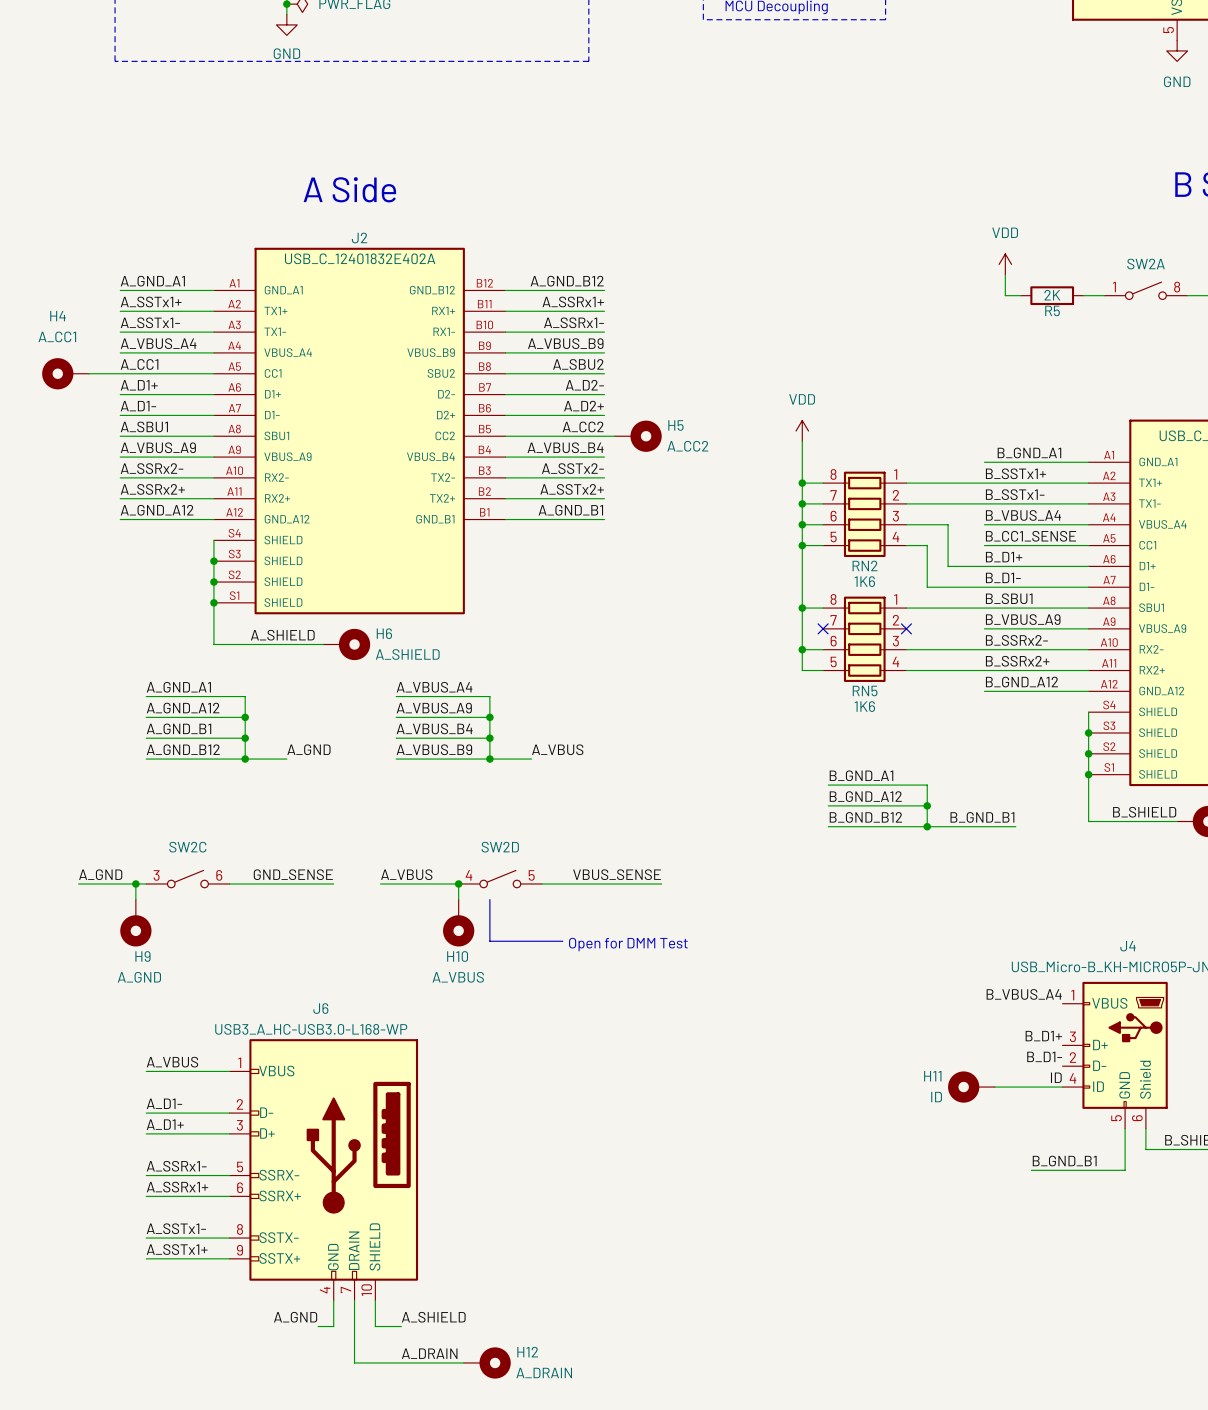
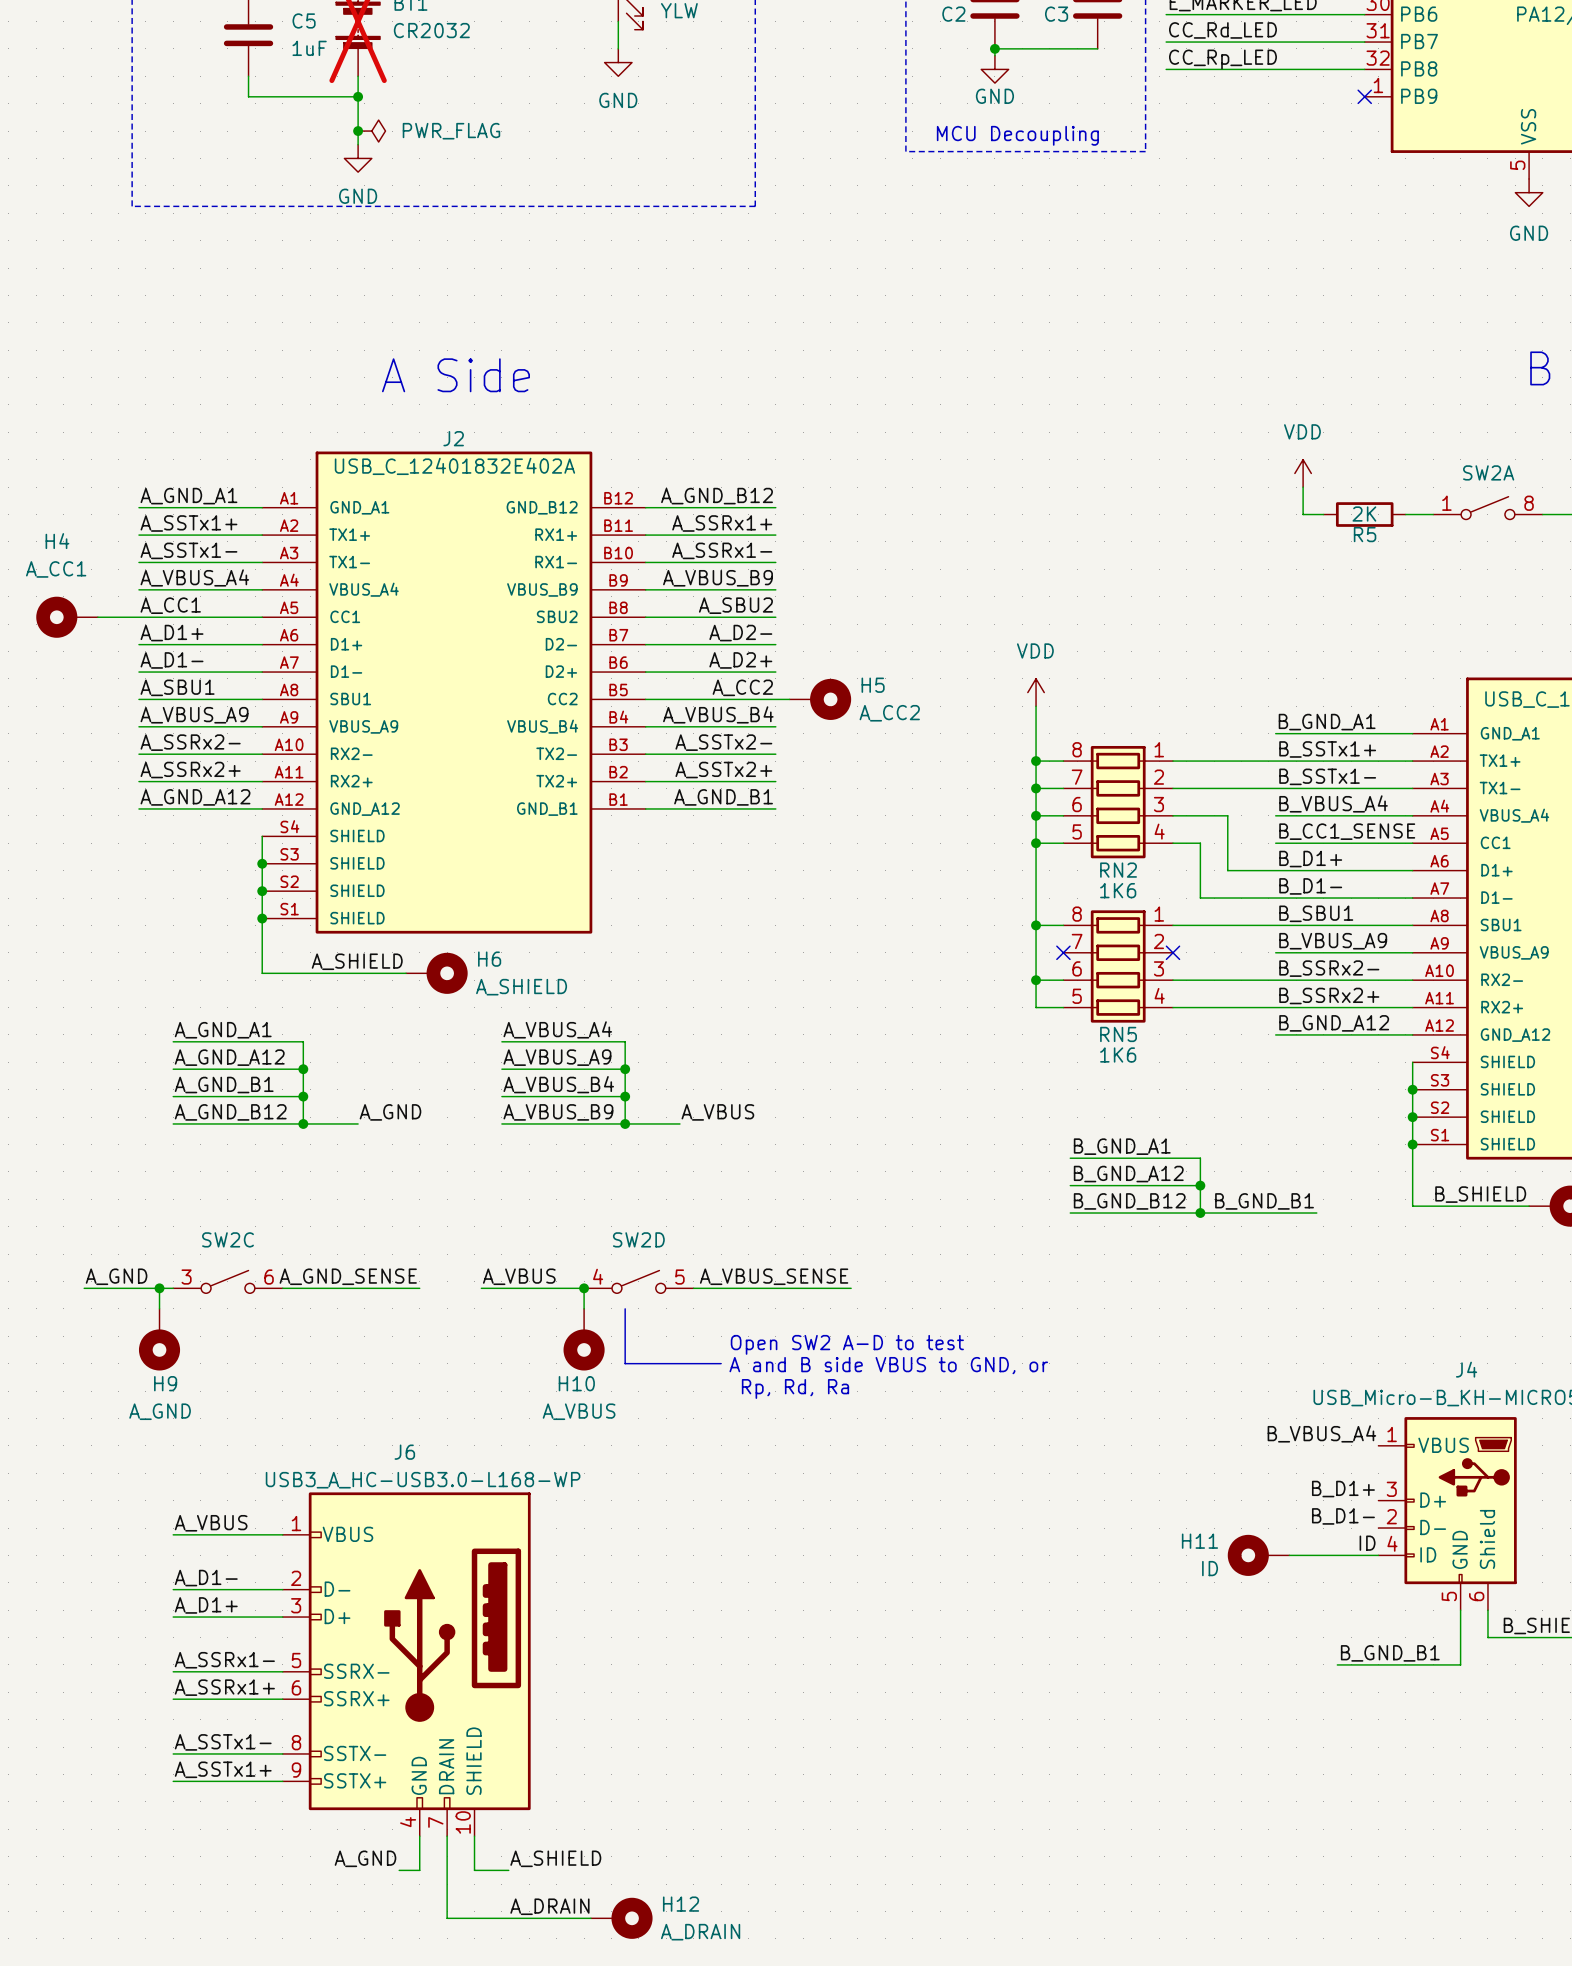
label: GND_SENSE (293, 874) -> A_GND_SENSE (348, 1276)
label: VBUS_SENSE (617, 874) -> A_VBUS_SENSE (774, 1276)
text: none -> Open SW2 A-D to test (847, 1344)
text: Open for DMM Test (628, 944) -> A and B side VBUS to GND, or (888, 1365)
text: none -> Rp, Rd, Ra (795, 1388)

